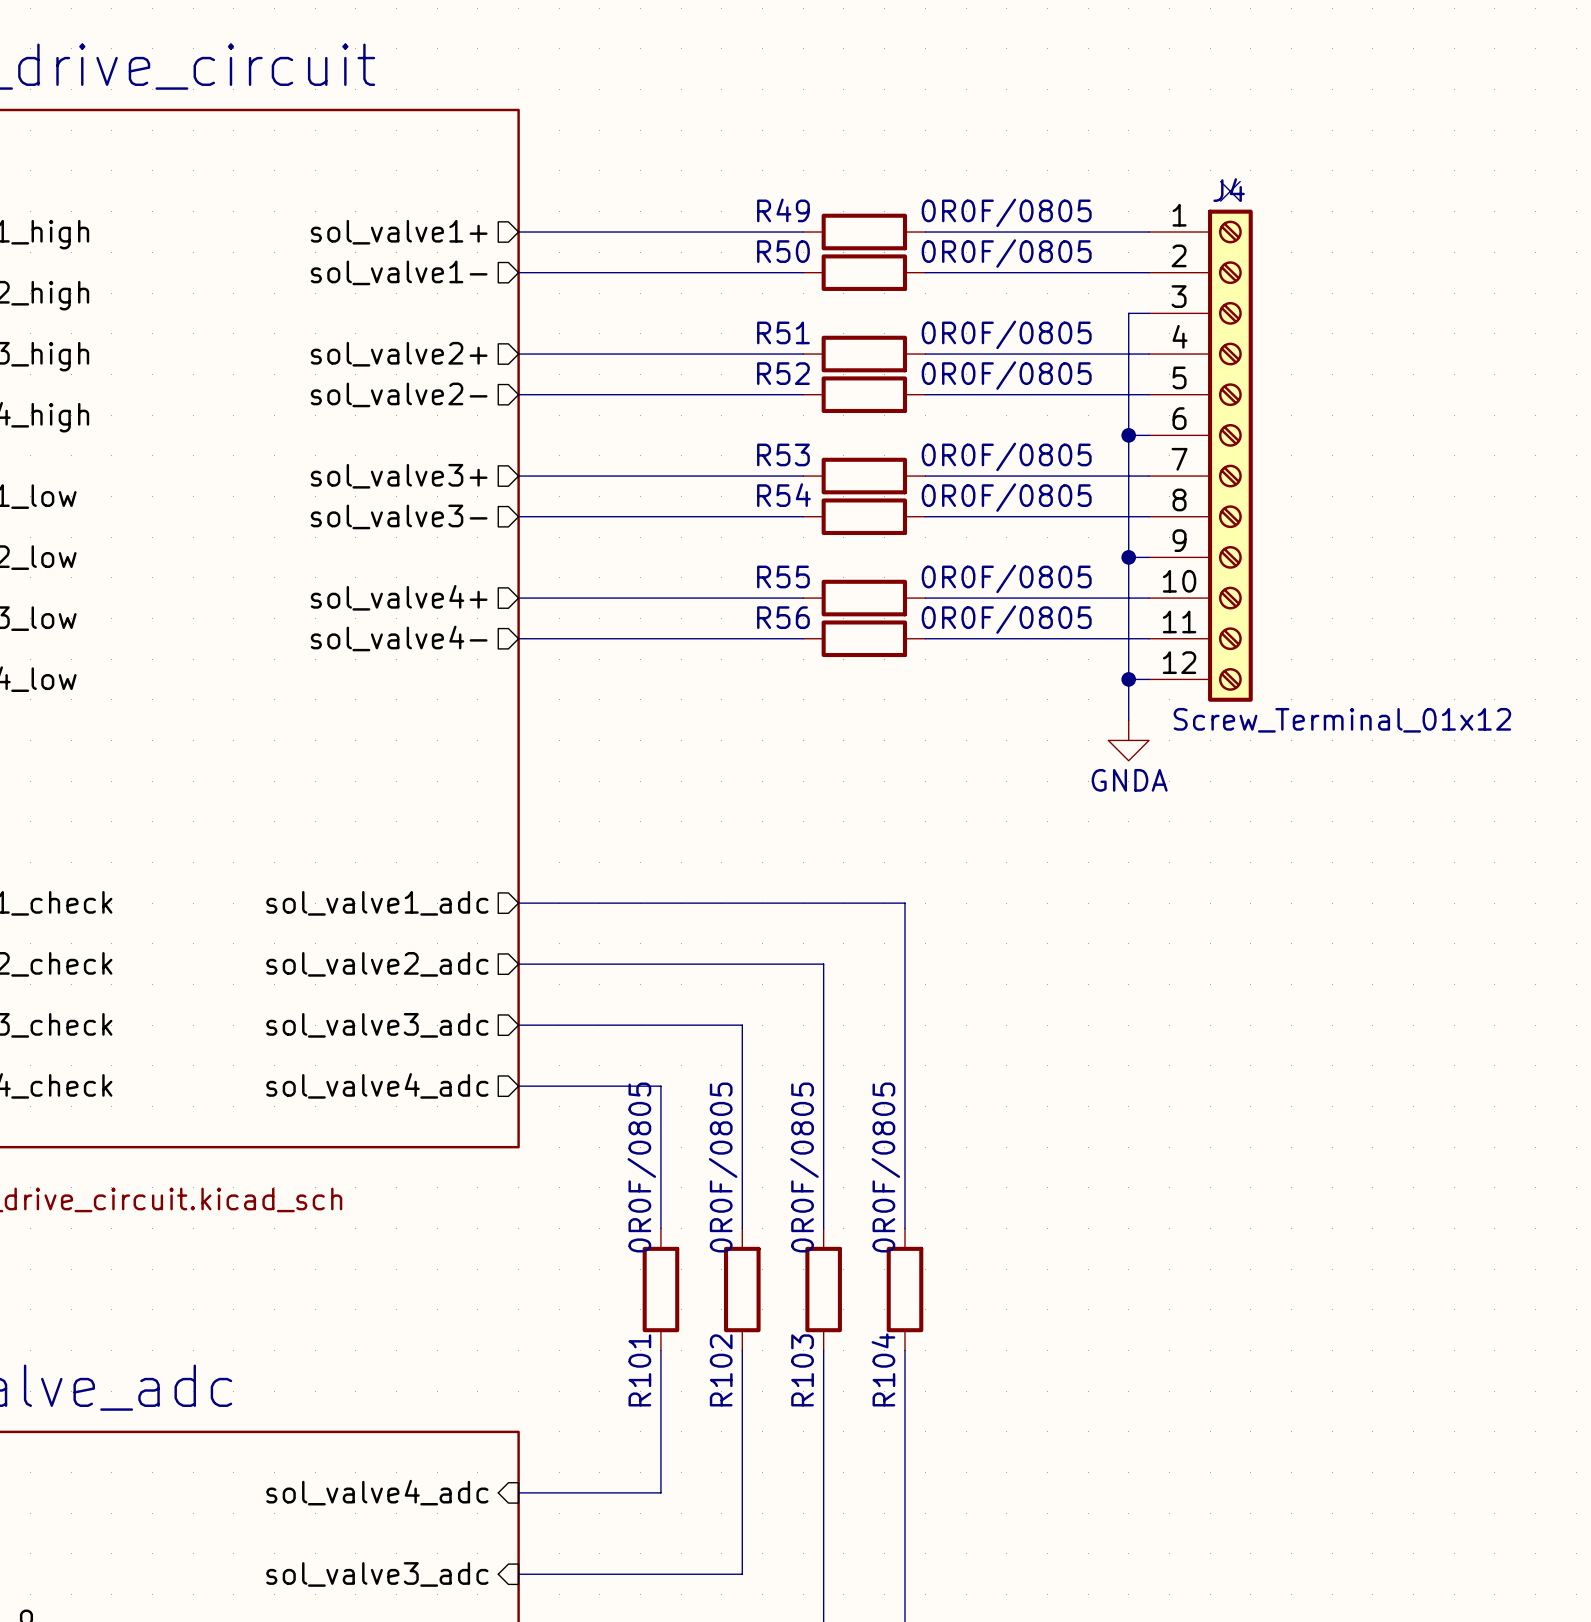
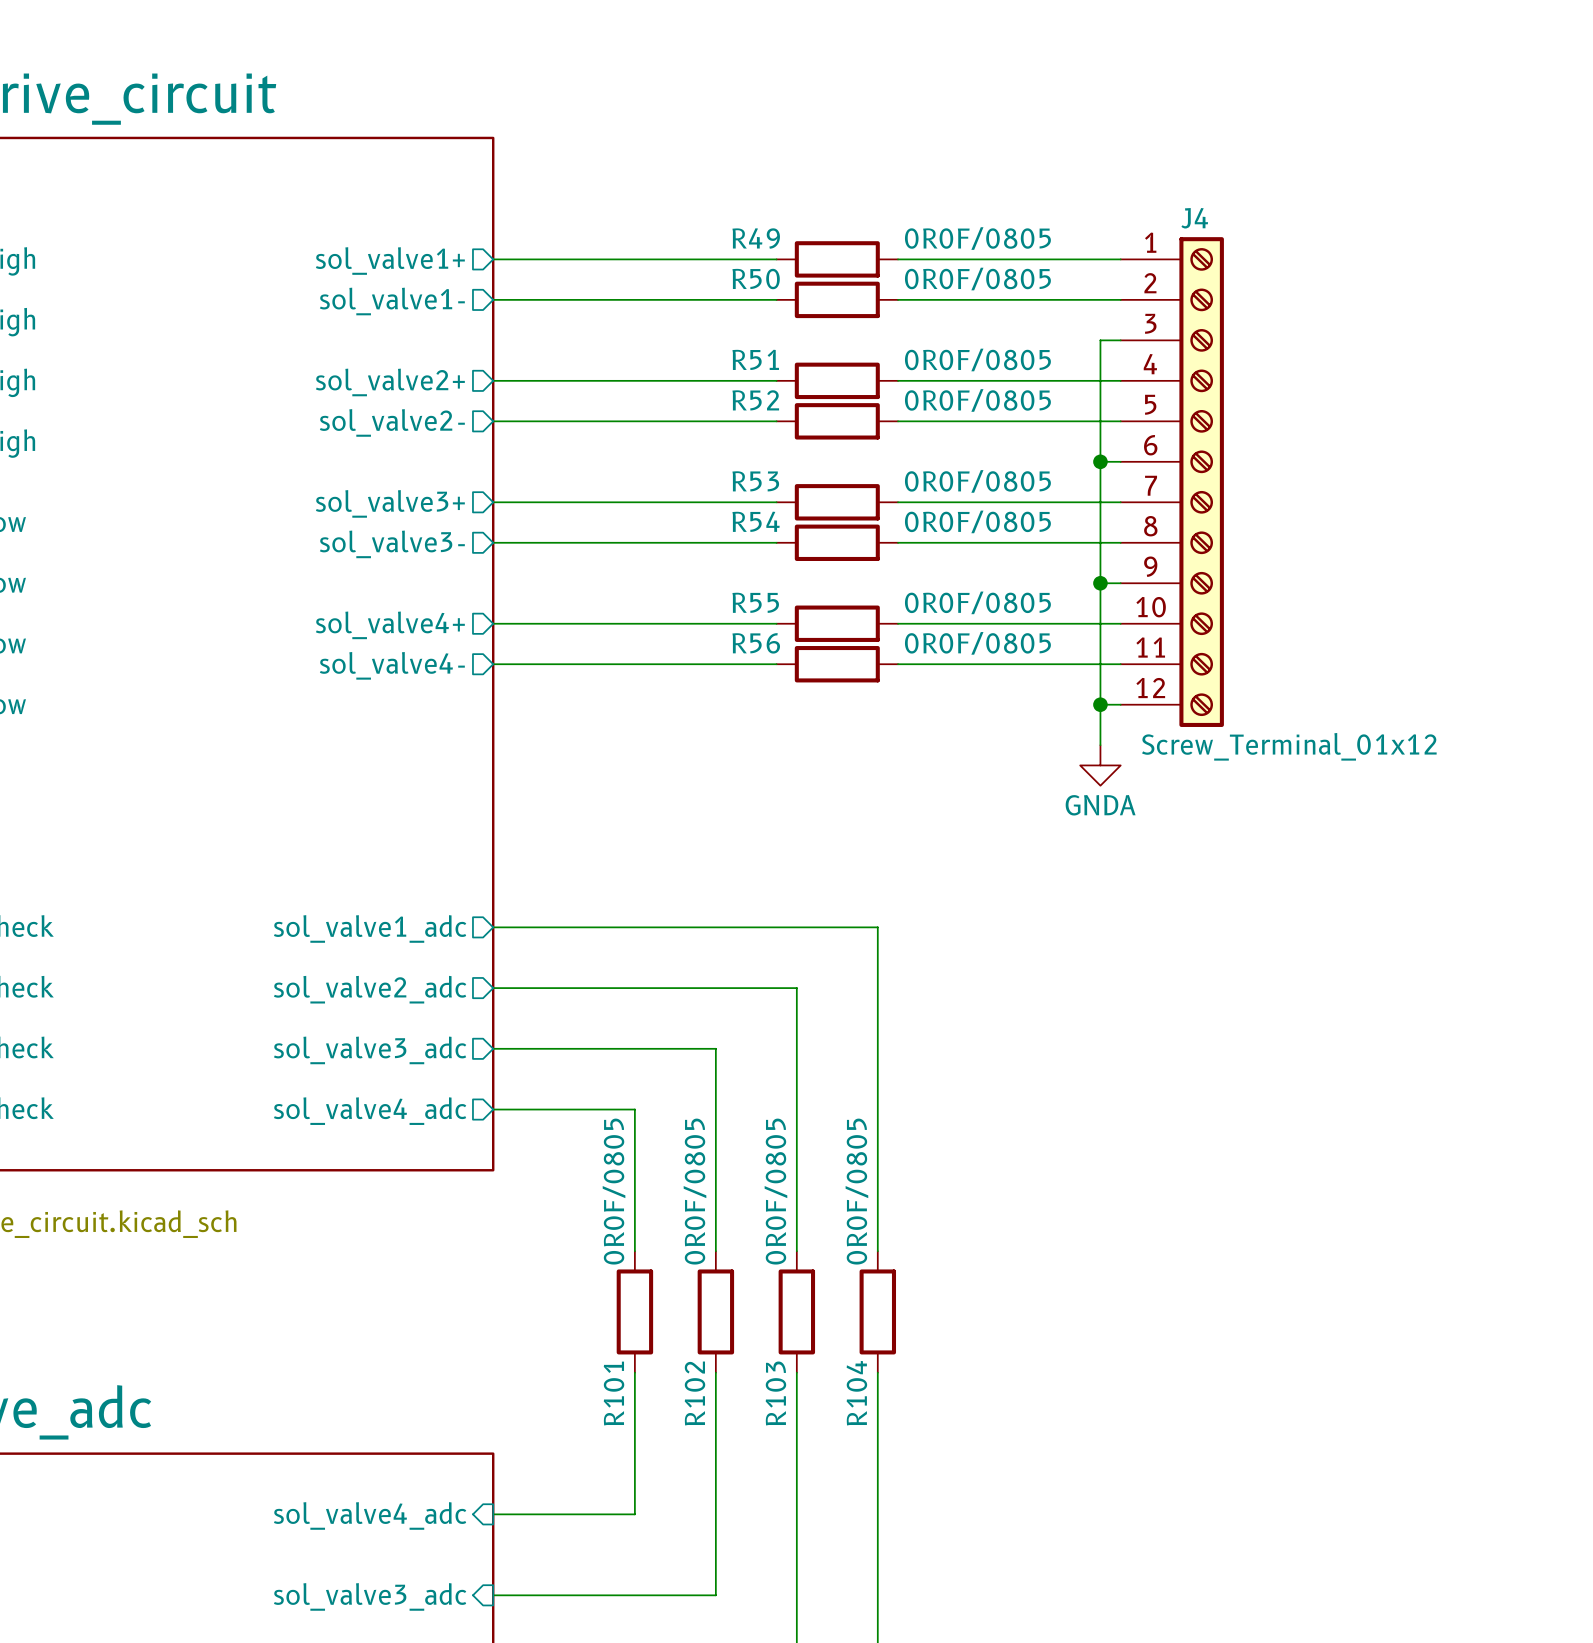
no-connect mark: (1230, 191) -> none

